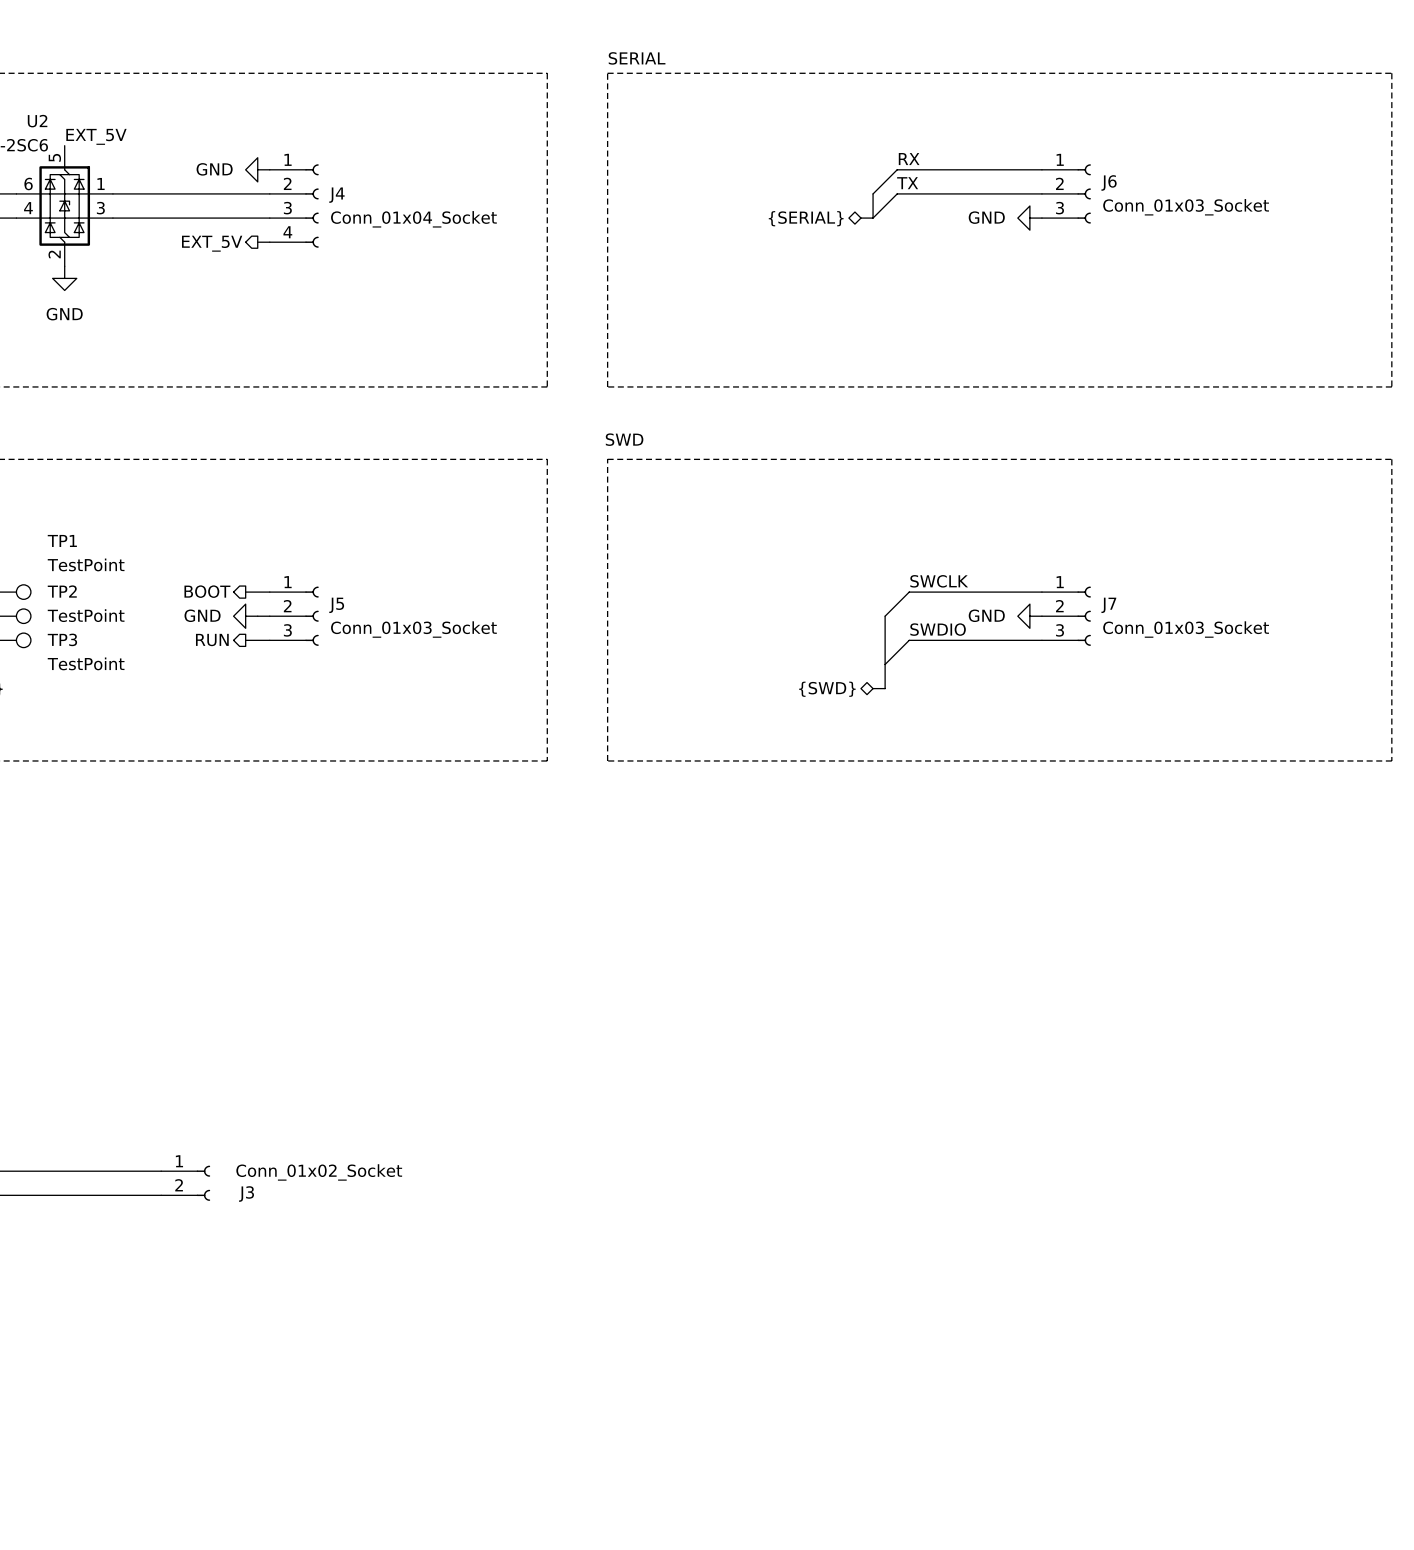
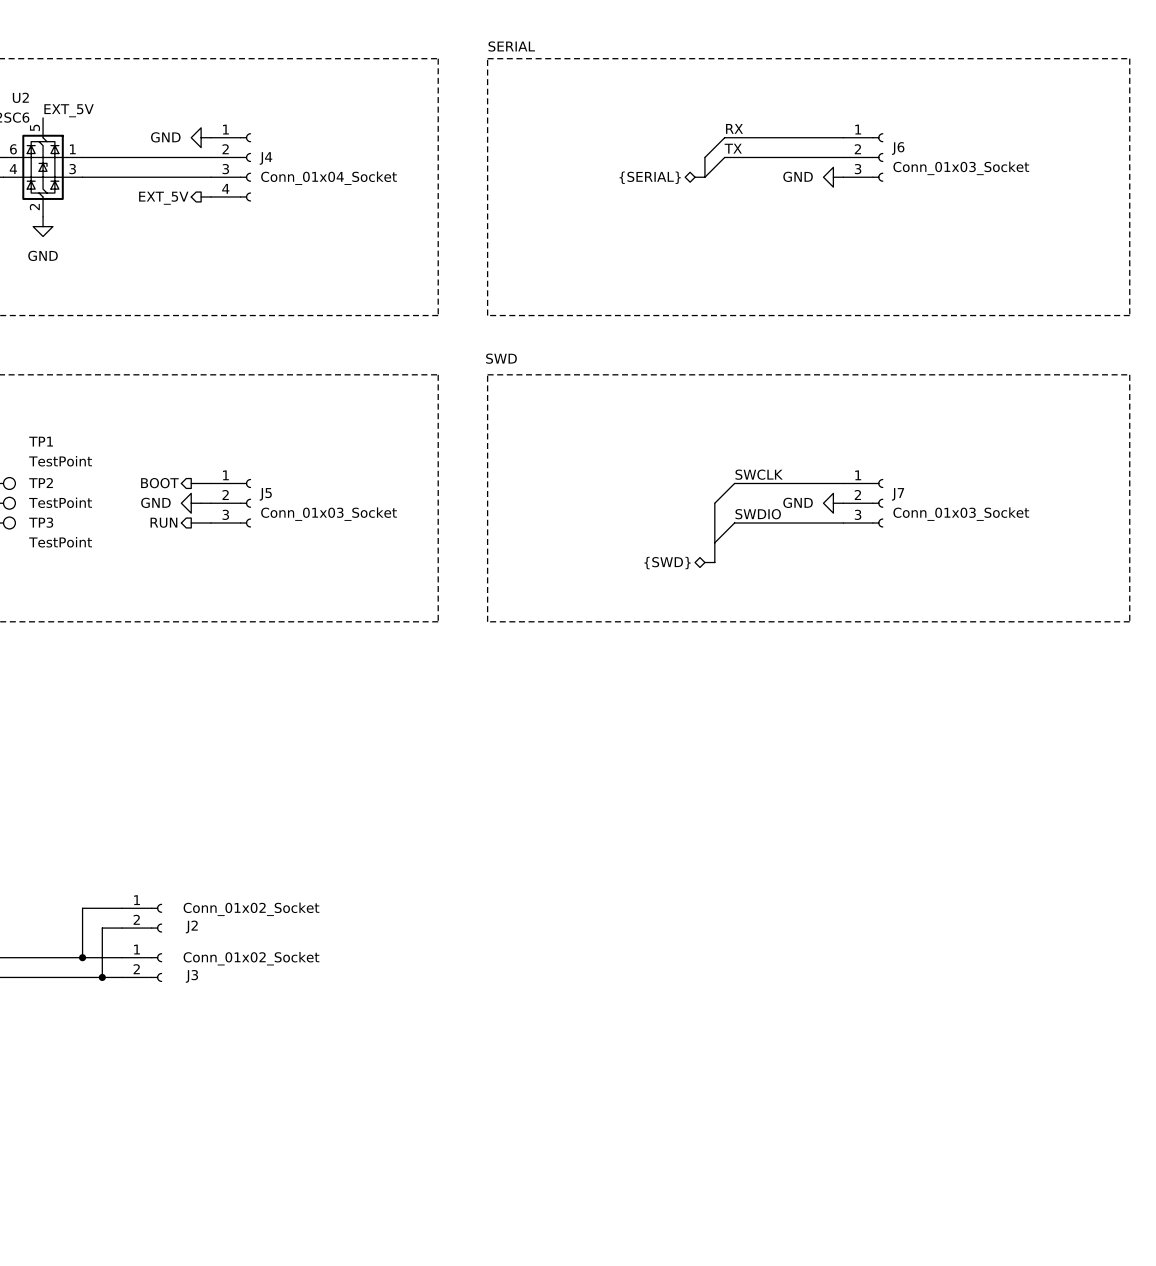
wire: none -> (122, 908) (82, 908) (82, 957)
J2: none -> Conn_01x02_Socket (142, 918)
wire: none -> (122, 928) (102, 928) (102, 977)
junction: none -> (82, 957)
junction: none -> (102, 977)

